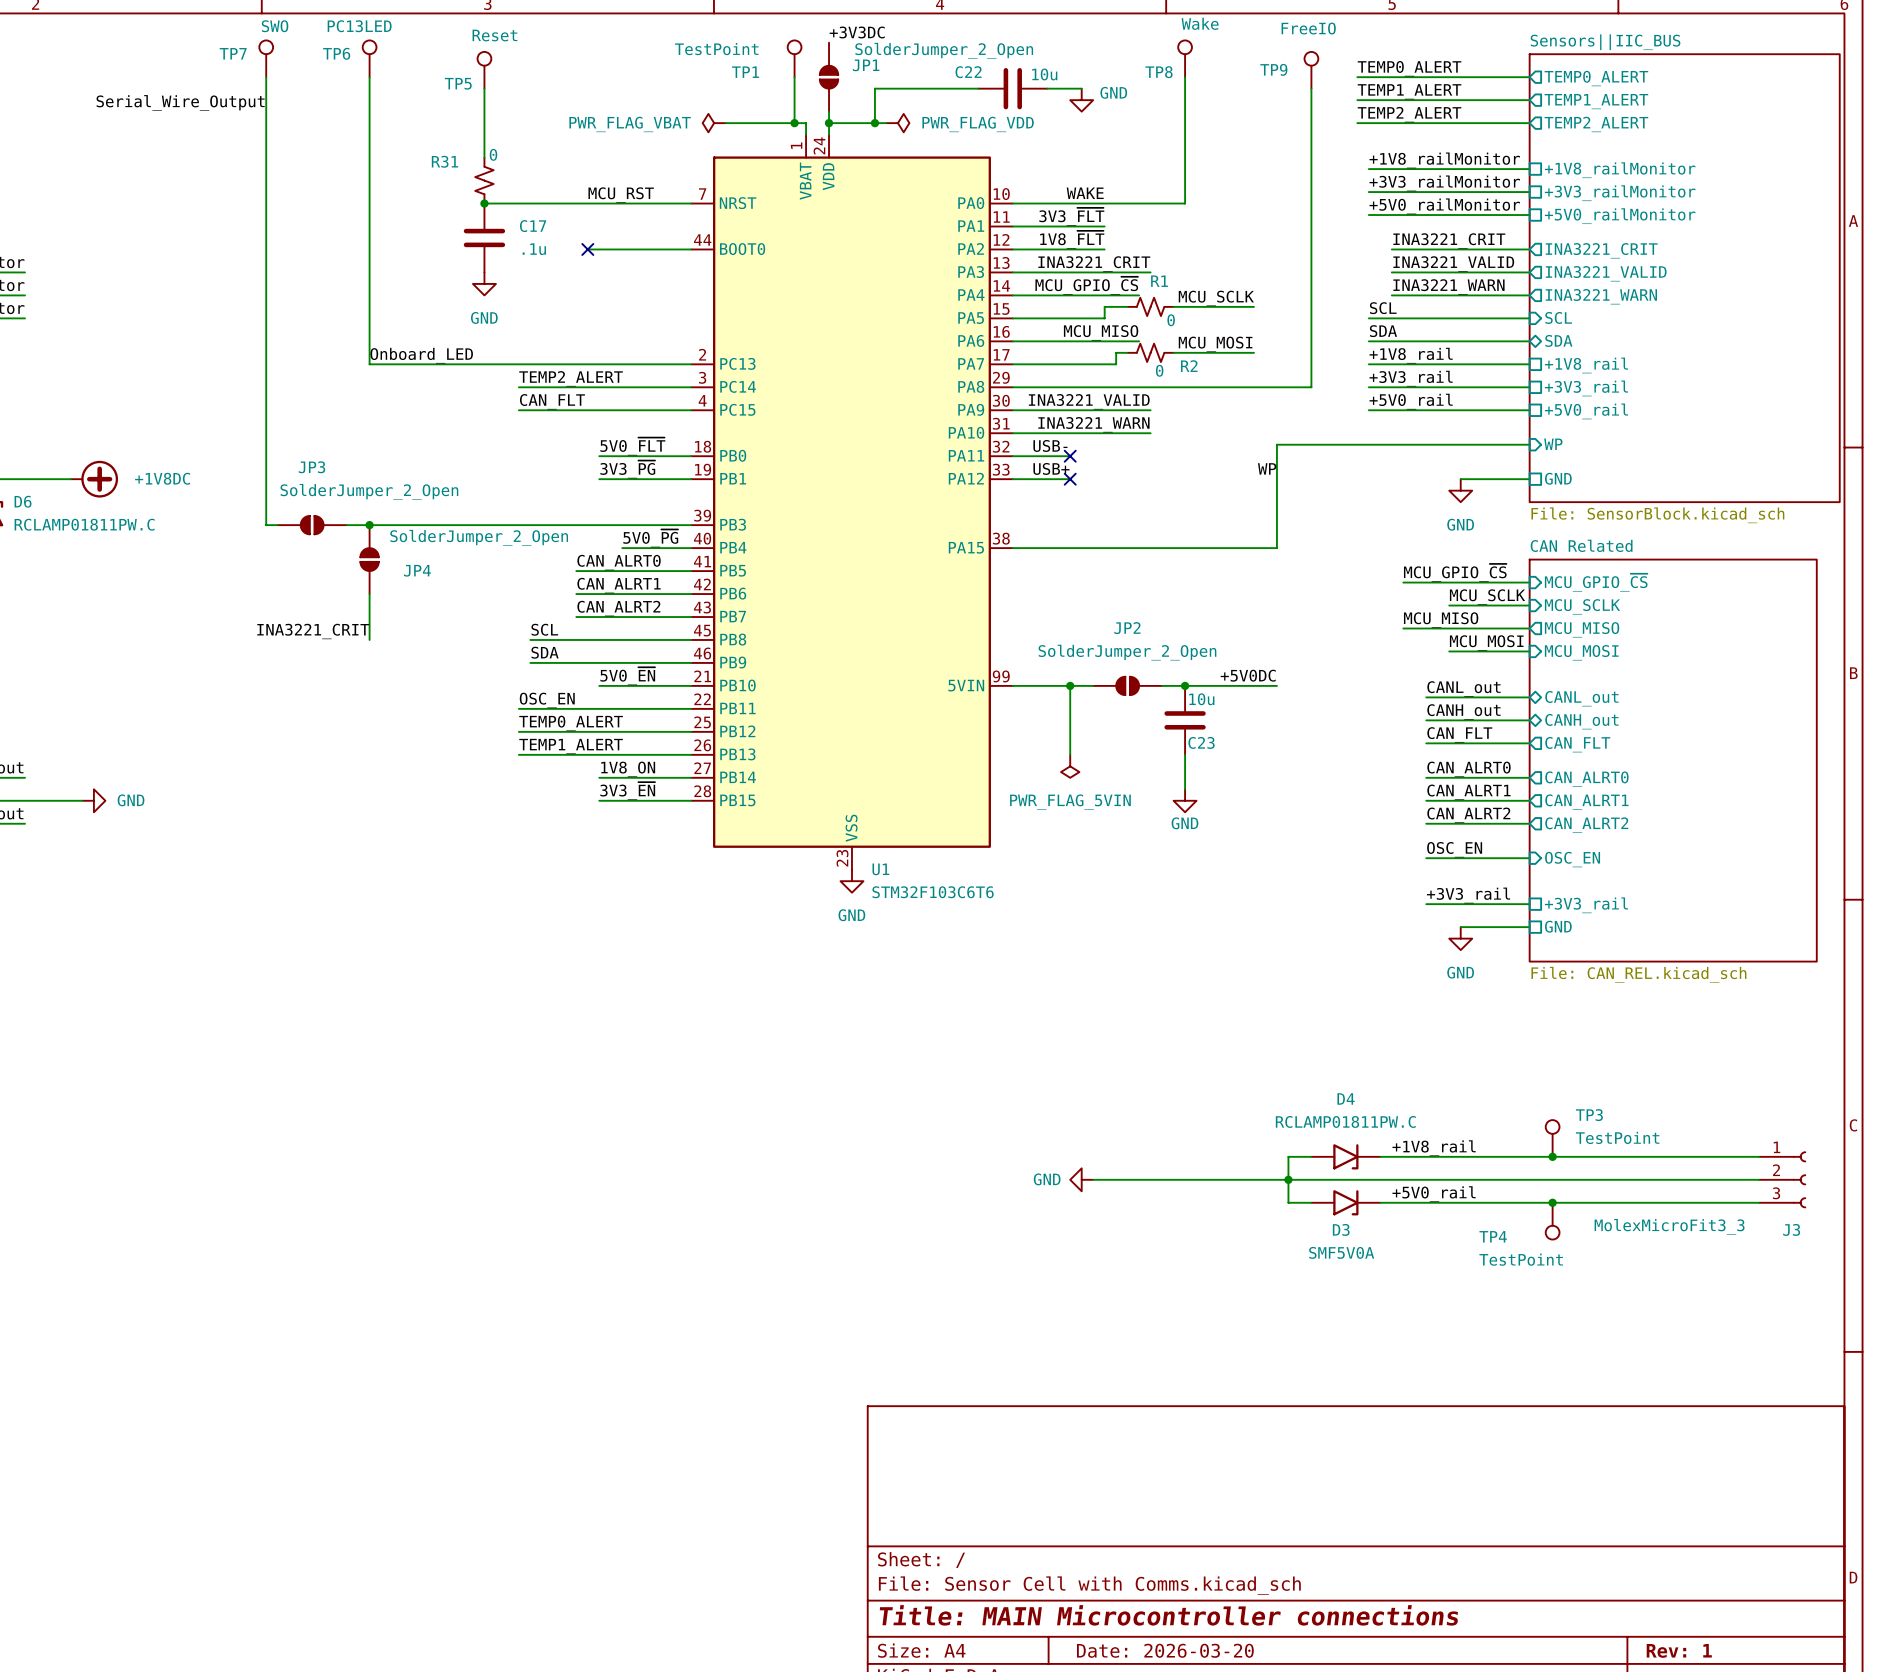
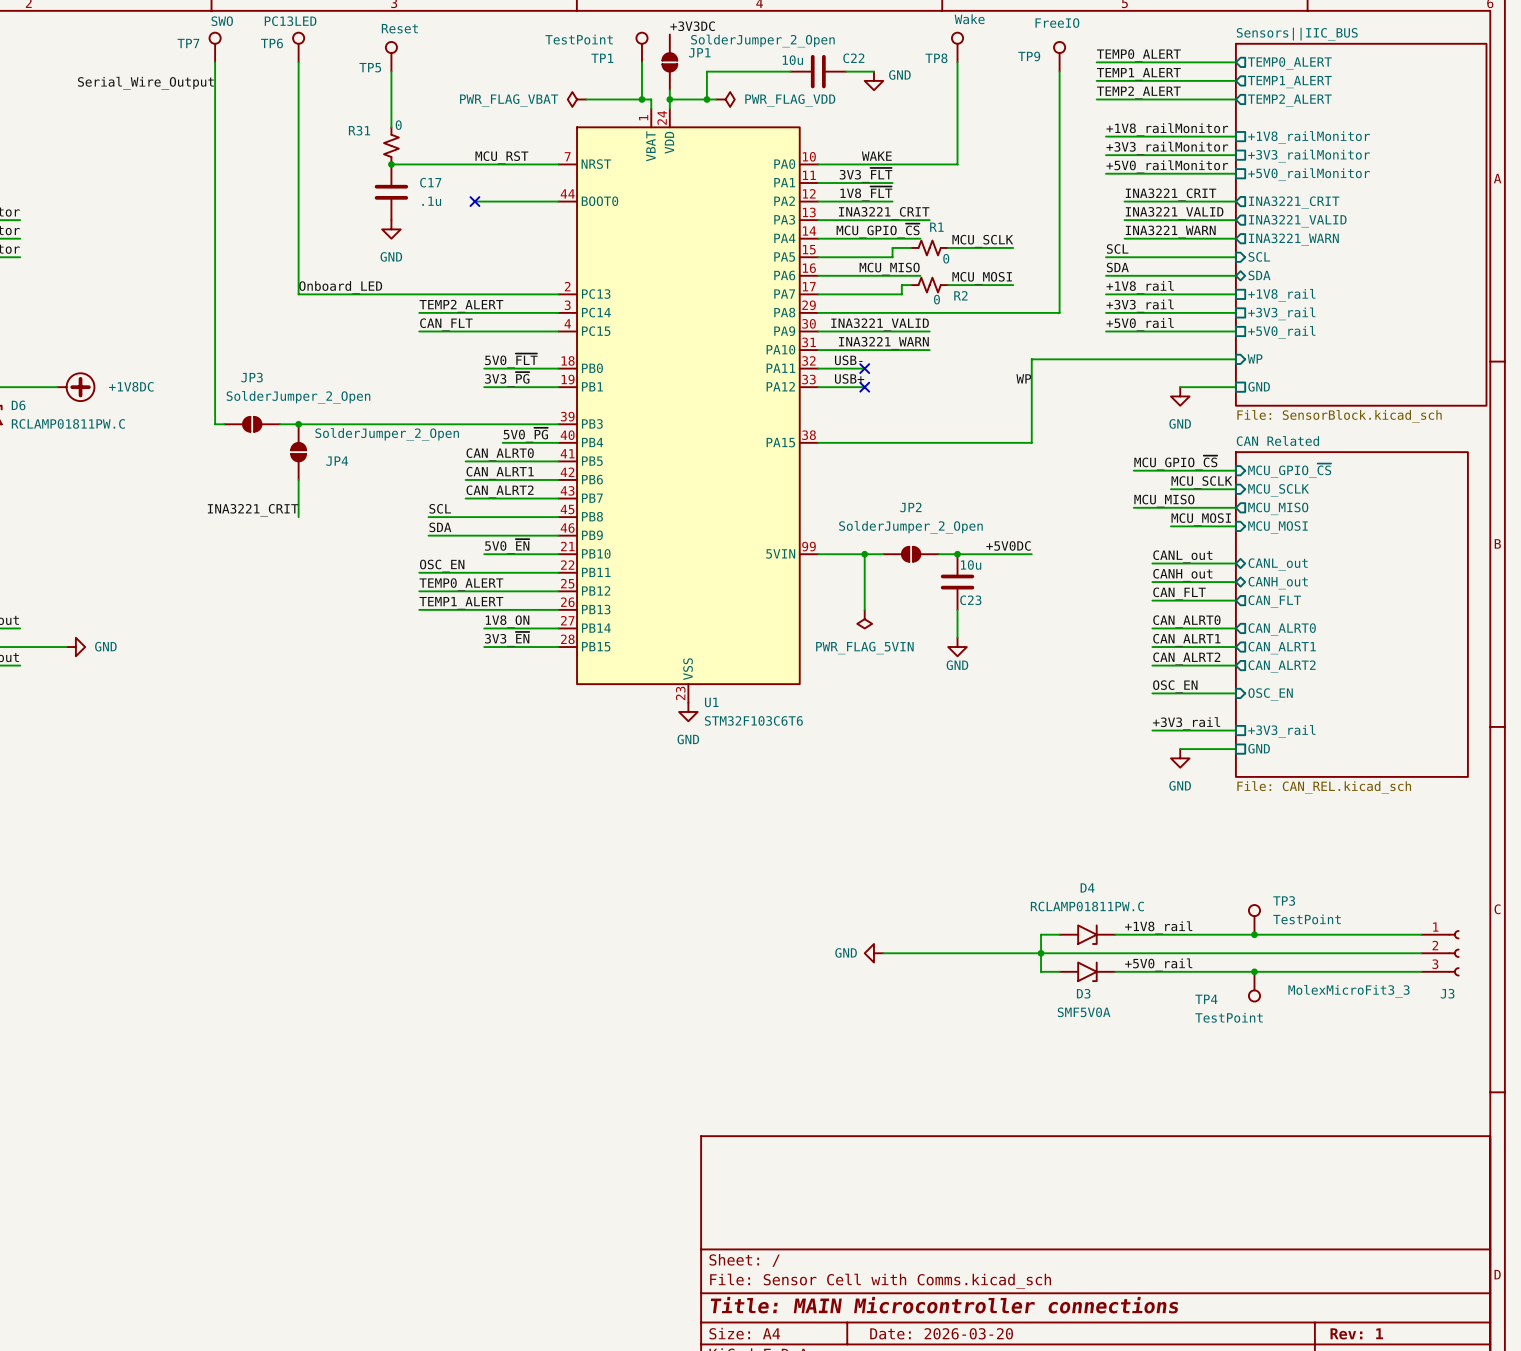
C22 name position: C22 (968, 72) -> C22 (853, 58)
C22 value position: 10u (1044, 74) -> 10u (792, 60)

